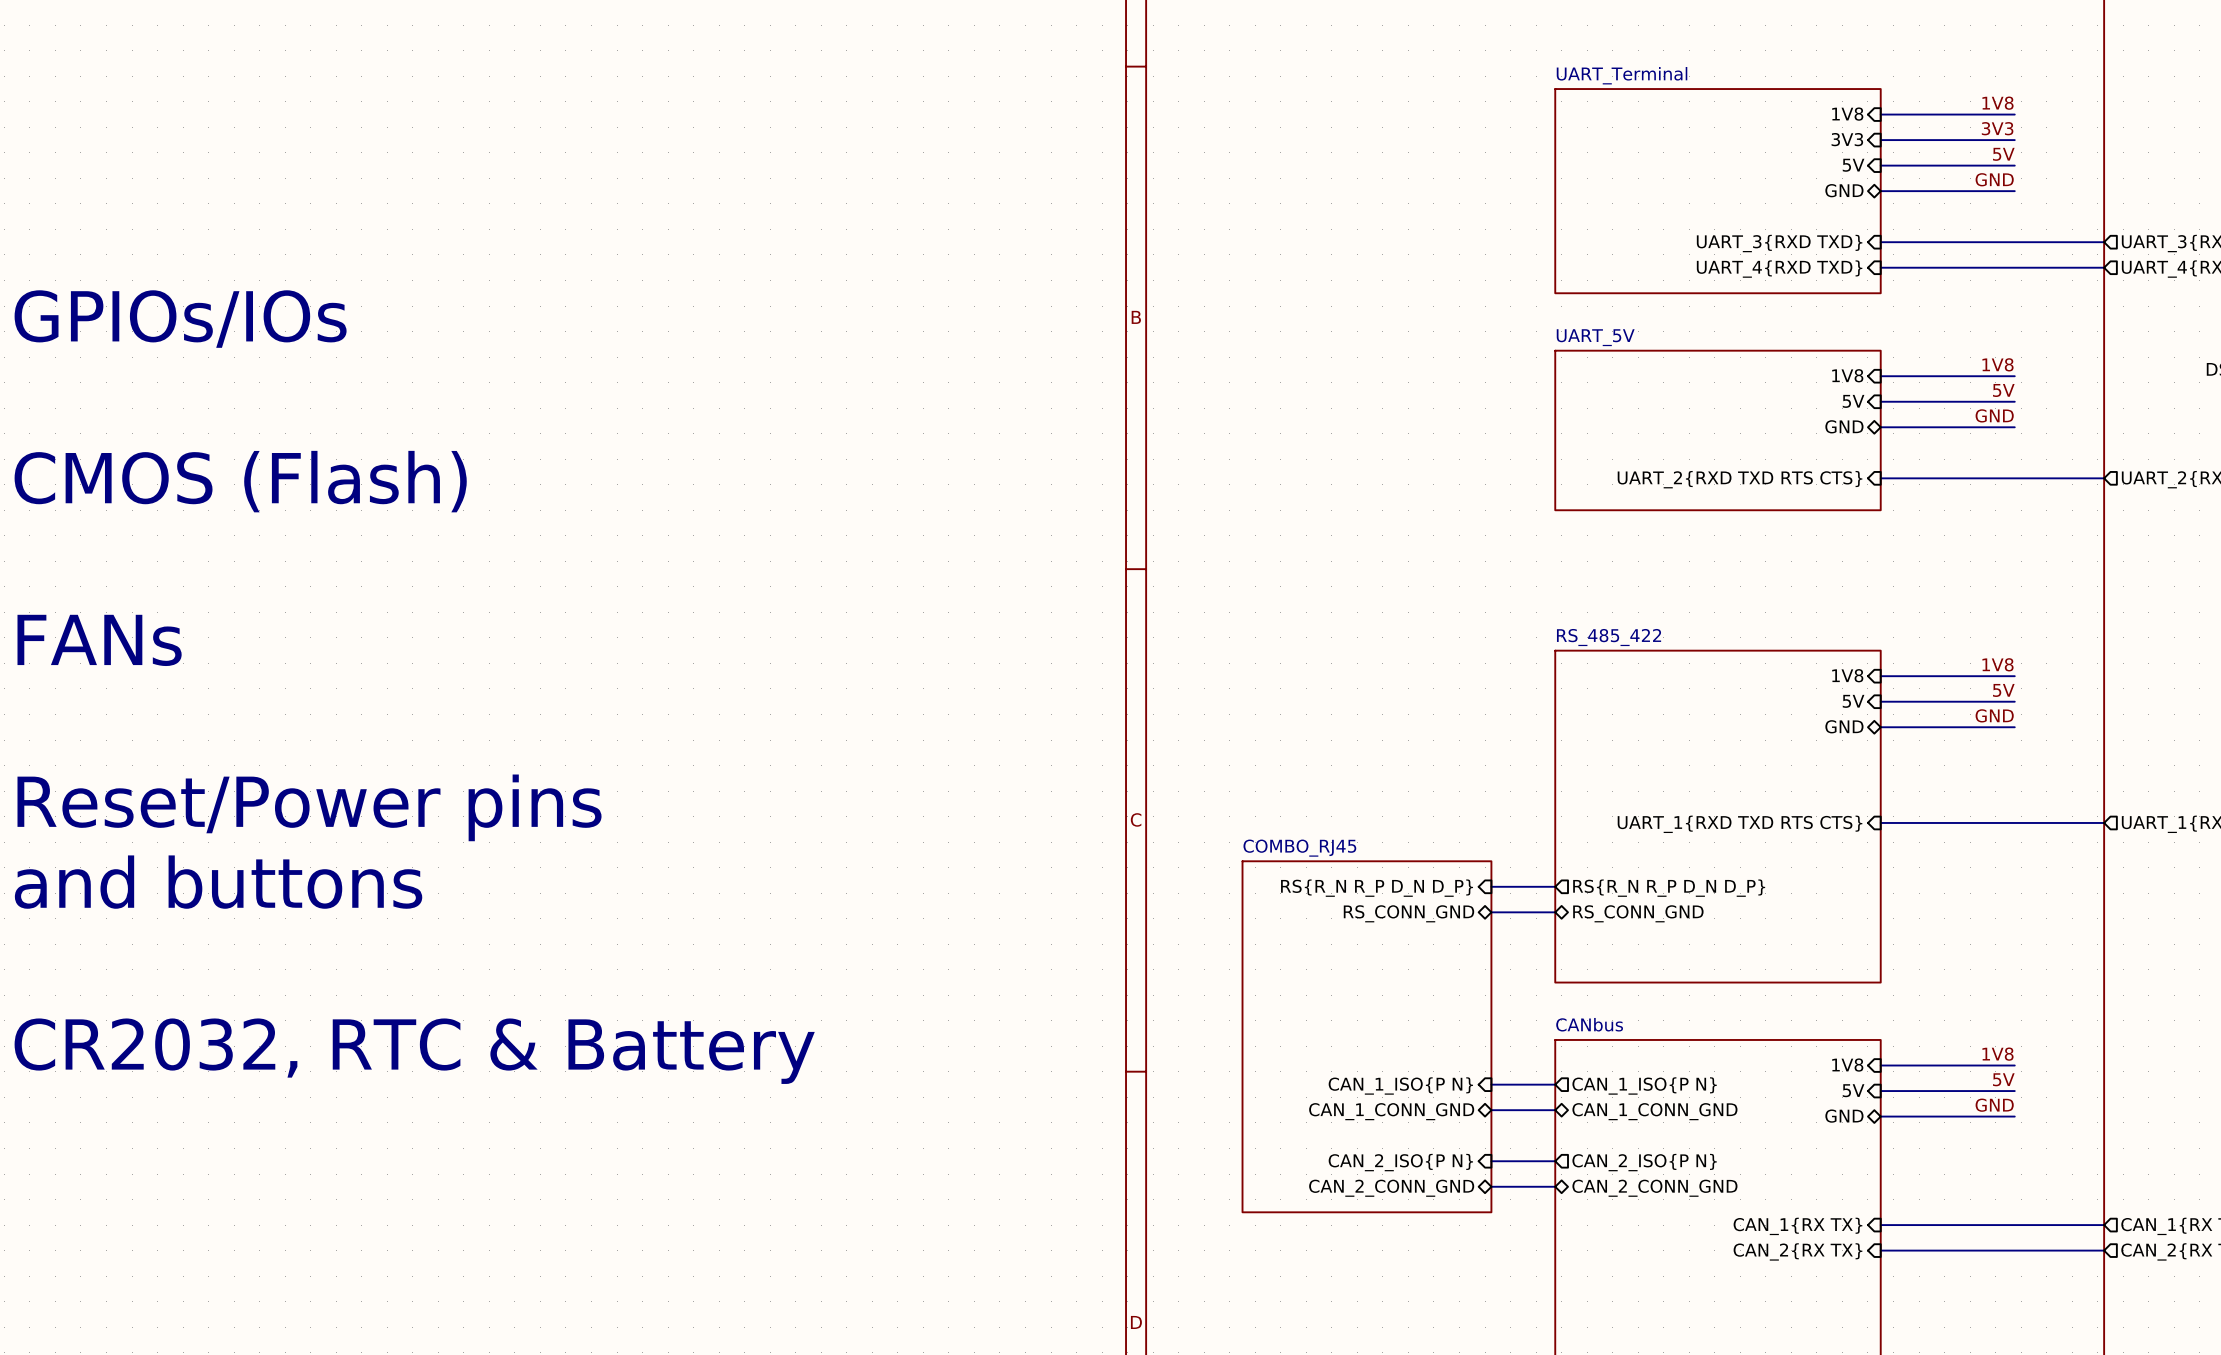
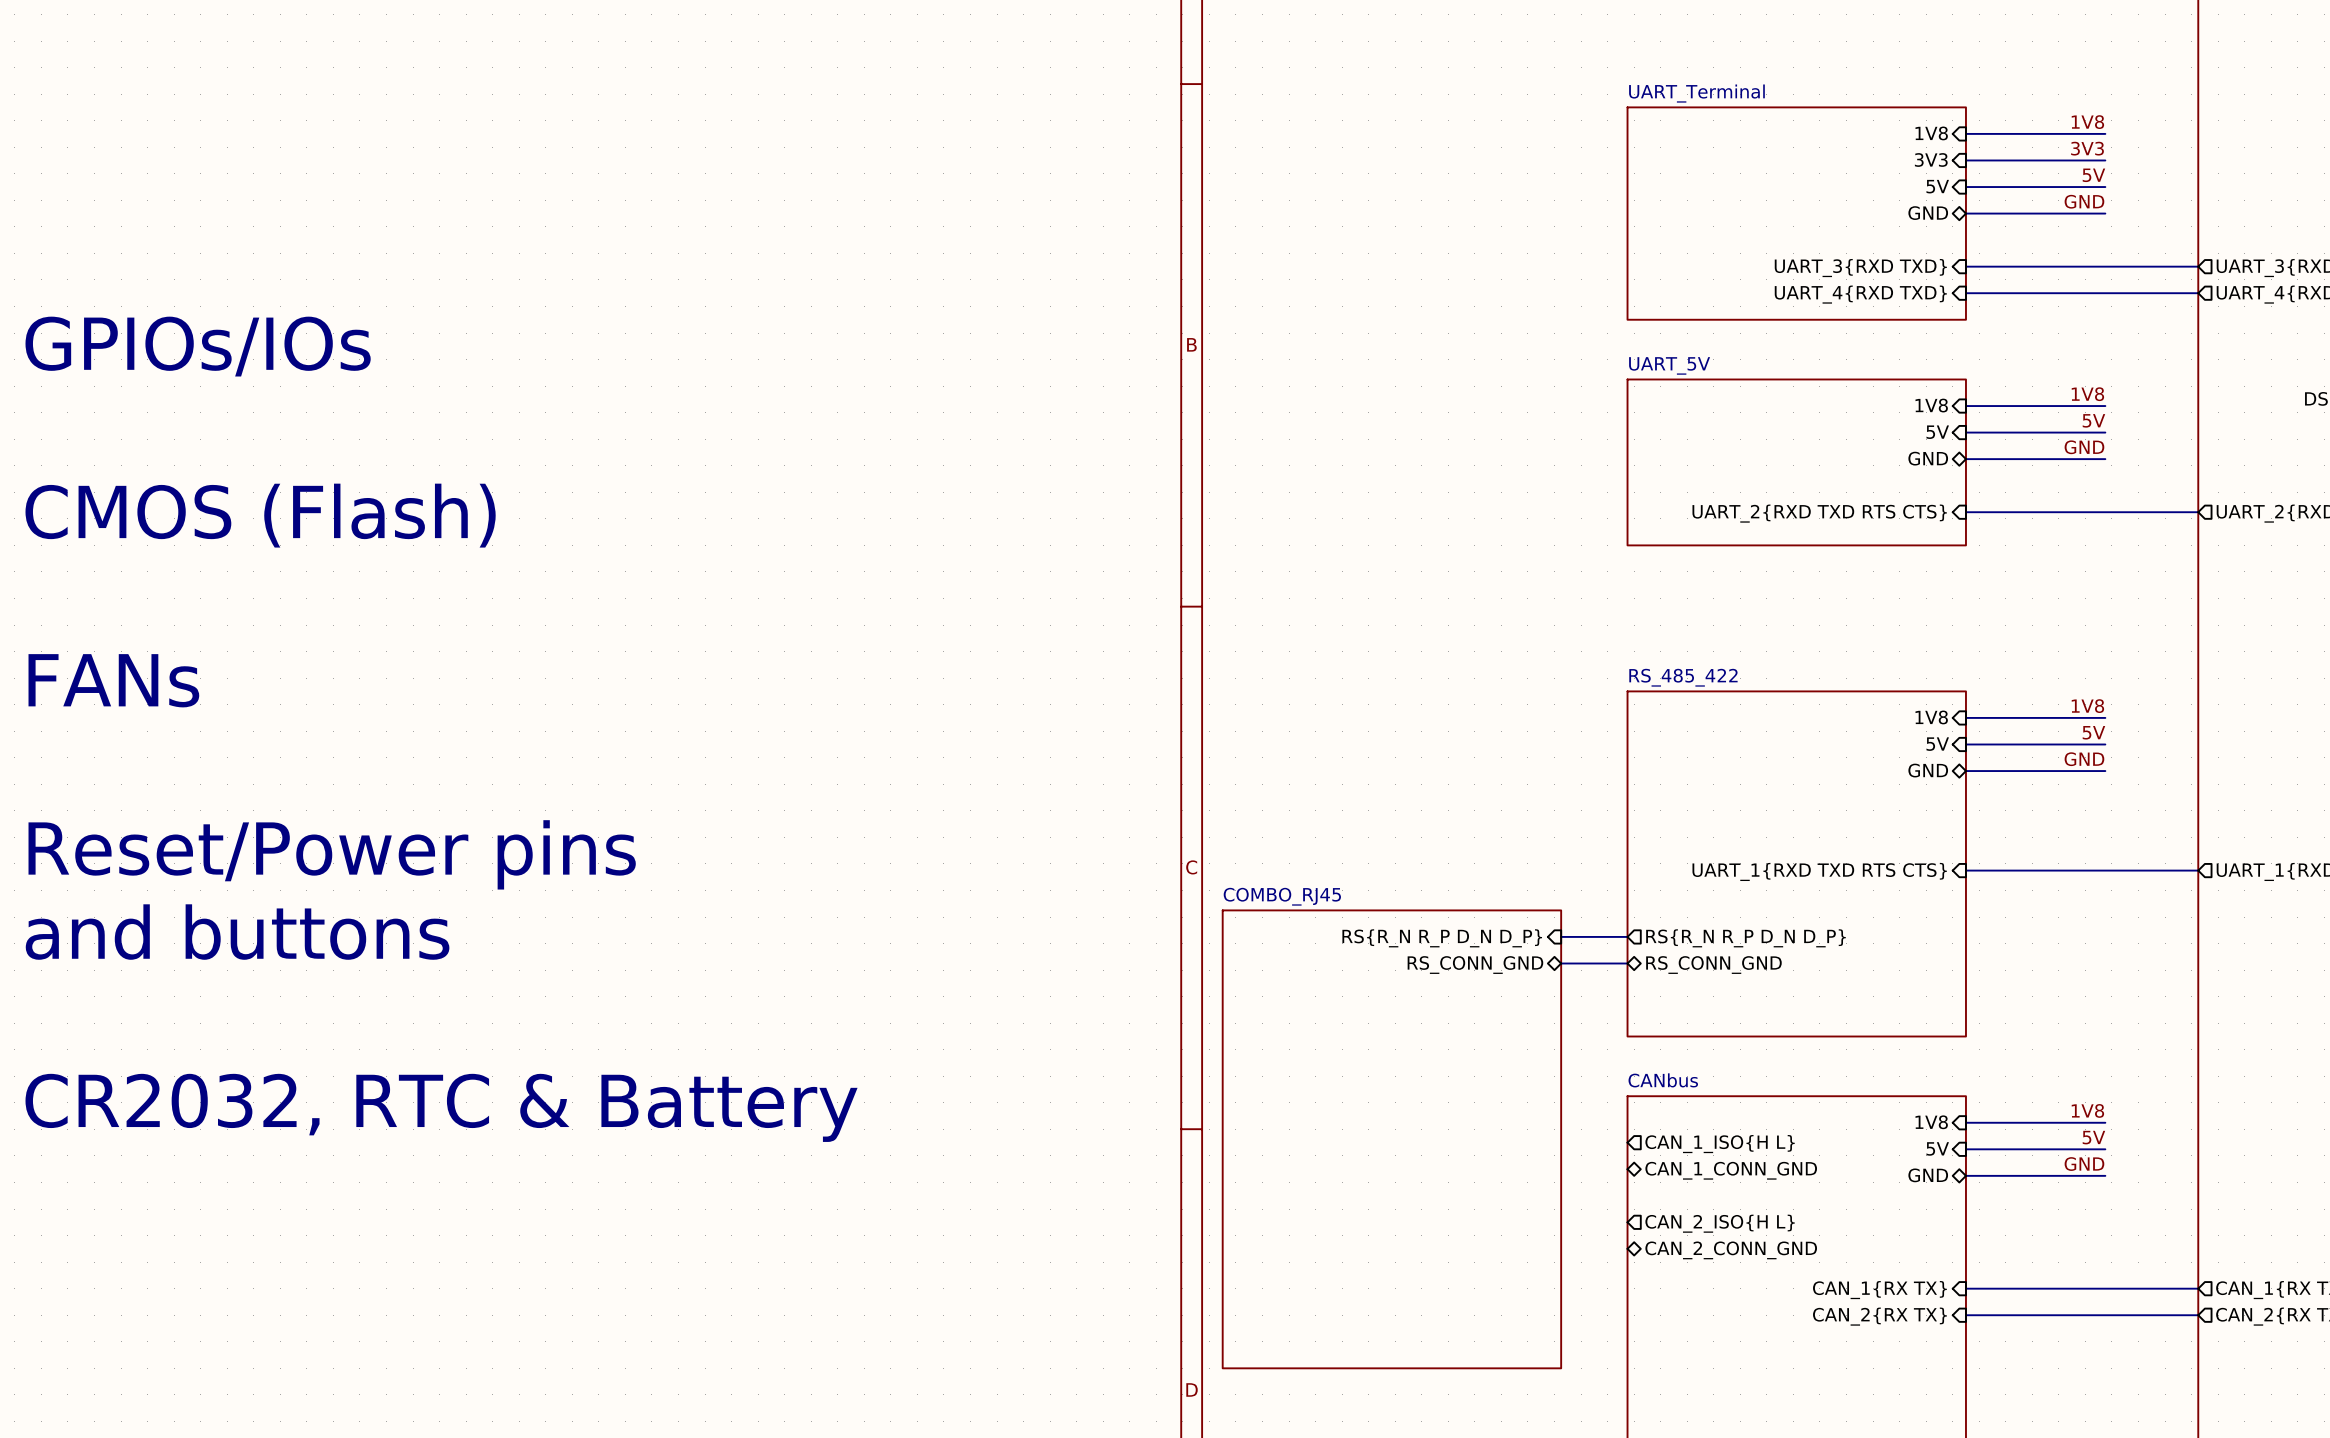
sheet COMBO_RJ45 name position: COMBO_RJ45 (1299, 848) -> COMBO_RJ45 (1282, 896)
sheet COMBO_RJ45 shape: [1241, 860, 1493, 1214] -> [1221, 909, 1562, 1370]
bus: (1491, 1084) (1555, 1084) -> none
sheet pin: CAN_1_ISO{P N} (1400, 1085) -> none
sheet pin: CAN_1_ISO{P N} (1644, 1085) -> CAN_1_ISO{H L} (1720, 1144)
wire: (1491, 1110) (1555, 1110) -> none
sheet pin: CAN_1_CONN_GND (1391, 1111) -> none
bus: (1491, 1161) (1555, 1161) -> none
sheet pin: CAN_2_ISO{P N} (1400, 1162) -> none
sheet pin: CAN_2_ISO{P N} (1644, 1162) -> CAN_2_ISO{H L} (1720, 1223)
wire: (1491, 1186) (1555, 1186) -> none
sheet pin: CAN_2_CONN_GND (1391, 1188) -> none

